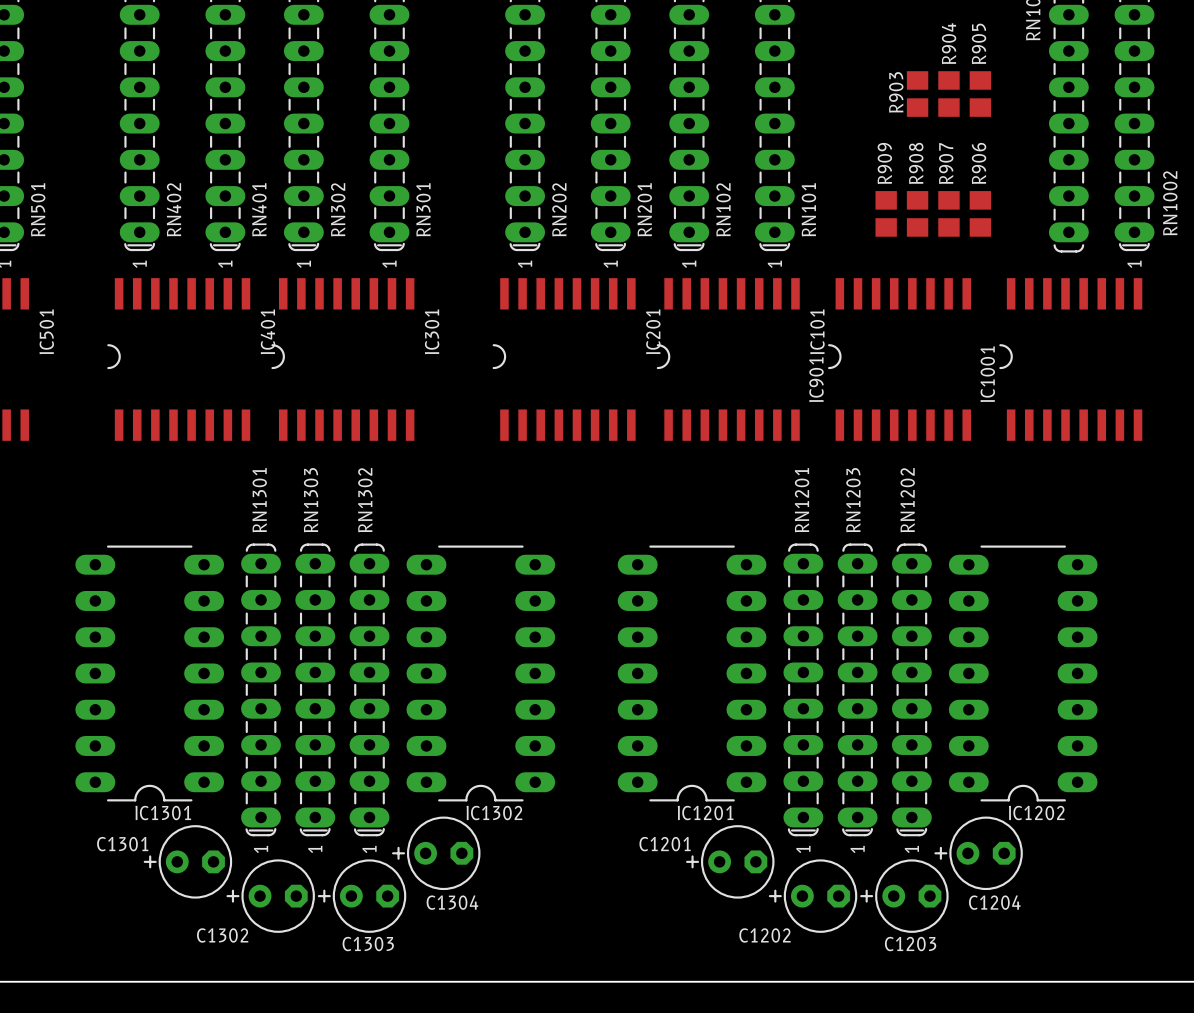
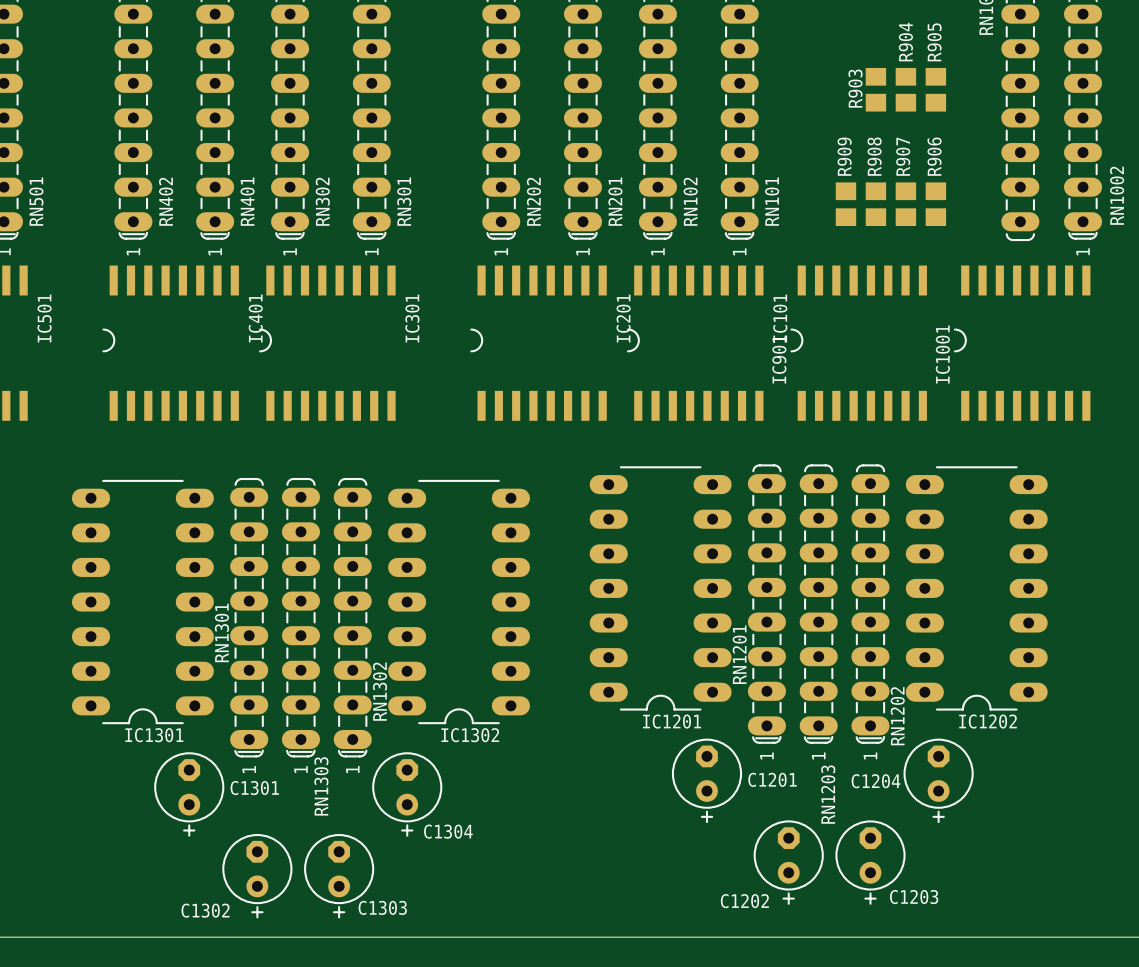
RN1301 name position: RN1301 (259, 500) -> RN1301 (221, 632)
RN1303 name position: RN1303 (311, 500) -> RN1303 (321, 786)
RN1302 name position: RN1302 (365, 500) -> RN1302 (380, 691)
RN1201 name position: RN1201 (802, 500) -> RN1201 (739, 654)
RN1203 name position: RN1203 (853, 500) -> RN1203 (828, 794)
RN1202 name position: RN1202 (907, 500) -> RN1202 (897, 716)
IC1301 position: (149, 673) -> (142, 602)
IC1302 position: (480, 673) -> (459, 602)
IC1201 position: (692, 673) -> (660, 588)
IC1202 position: (1023, 673) -> (976, 588)
RN1301 position: (261, 689) -> (249, 617)
RN1303 position: (315, 689) -> (300, 617)
RN1302 position: (369, 689) -> (352, 617)
RN1201 position: (803, 689) -> (766, 604)
RN1203 position: (857, 689) -> (818, 604)
RN1202 position: (911, 689) -> (870, 604)
C1301 name position: C1301 (122, 844) -> C1301 (254, 788)
C1201 name position: C1201 (665, 844) -> C1201 (772, 779)
C1304 rotation: 0° (436, 853) -> 90° counterclockwise (407, 794)
C1204 rotation: 0° (978, 853) -> 90° counterclockwise (938, 780)
C1301 rotation: 0° (187, 861) -> 90° counterclockwise (189, 794)
C1201 rotation: 0° (730, 861) -> 90° counterclockwise (706, 780)
C1302 rotation: 0° (270, 896) -> 90° counterclockwise (257, 876)
C1303 rotation: 0° (362, 896) -> 90° counterclockwise (339, 876)
C1202 rotation: 0° (813, 896) -> 90° counterclockwise (788, 862)
C1203 rotation: 0° (904, 896) -> 90° counterclockwise (870, 862)
C1304 name position: C1304 (452, 902) -> C1304 (448, 831)
C1204 name position: C1204 (994, 902) -> C1204 (875, 781)
C1303 name position: C1303 (368, 944) -> C1303 (382, 907)
C1203 name position: C1203 (910, 944) -> C1203 (914, 897)

